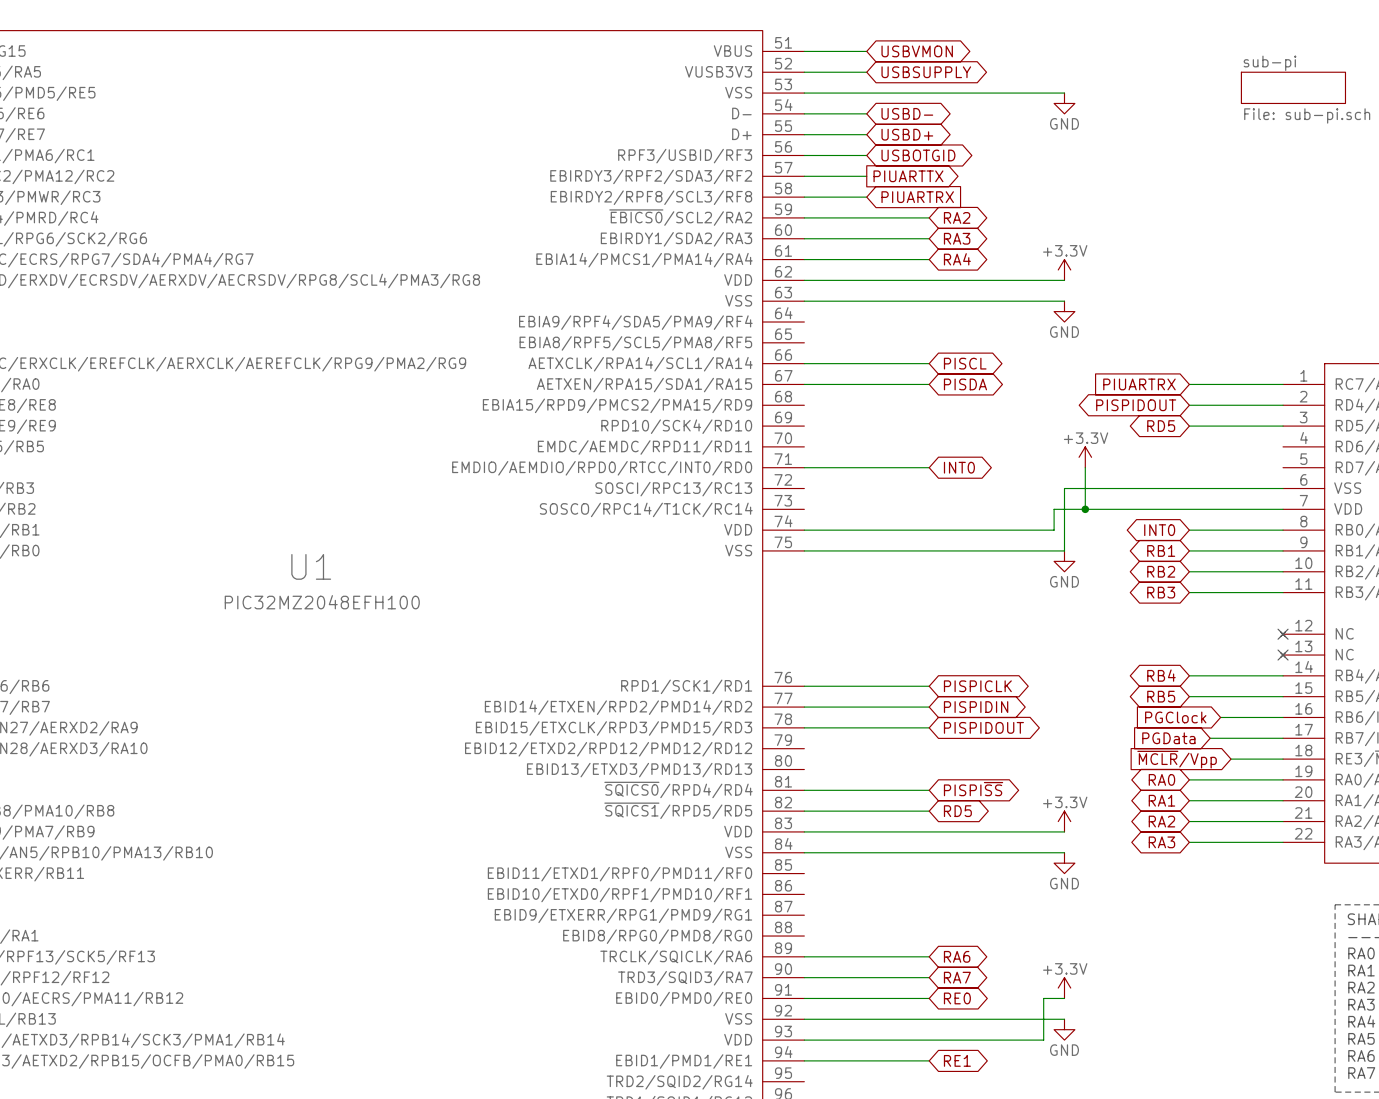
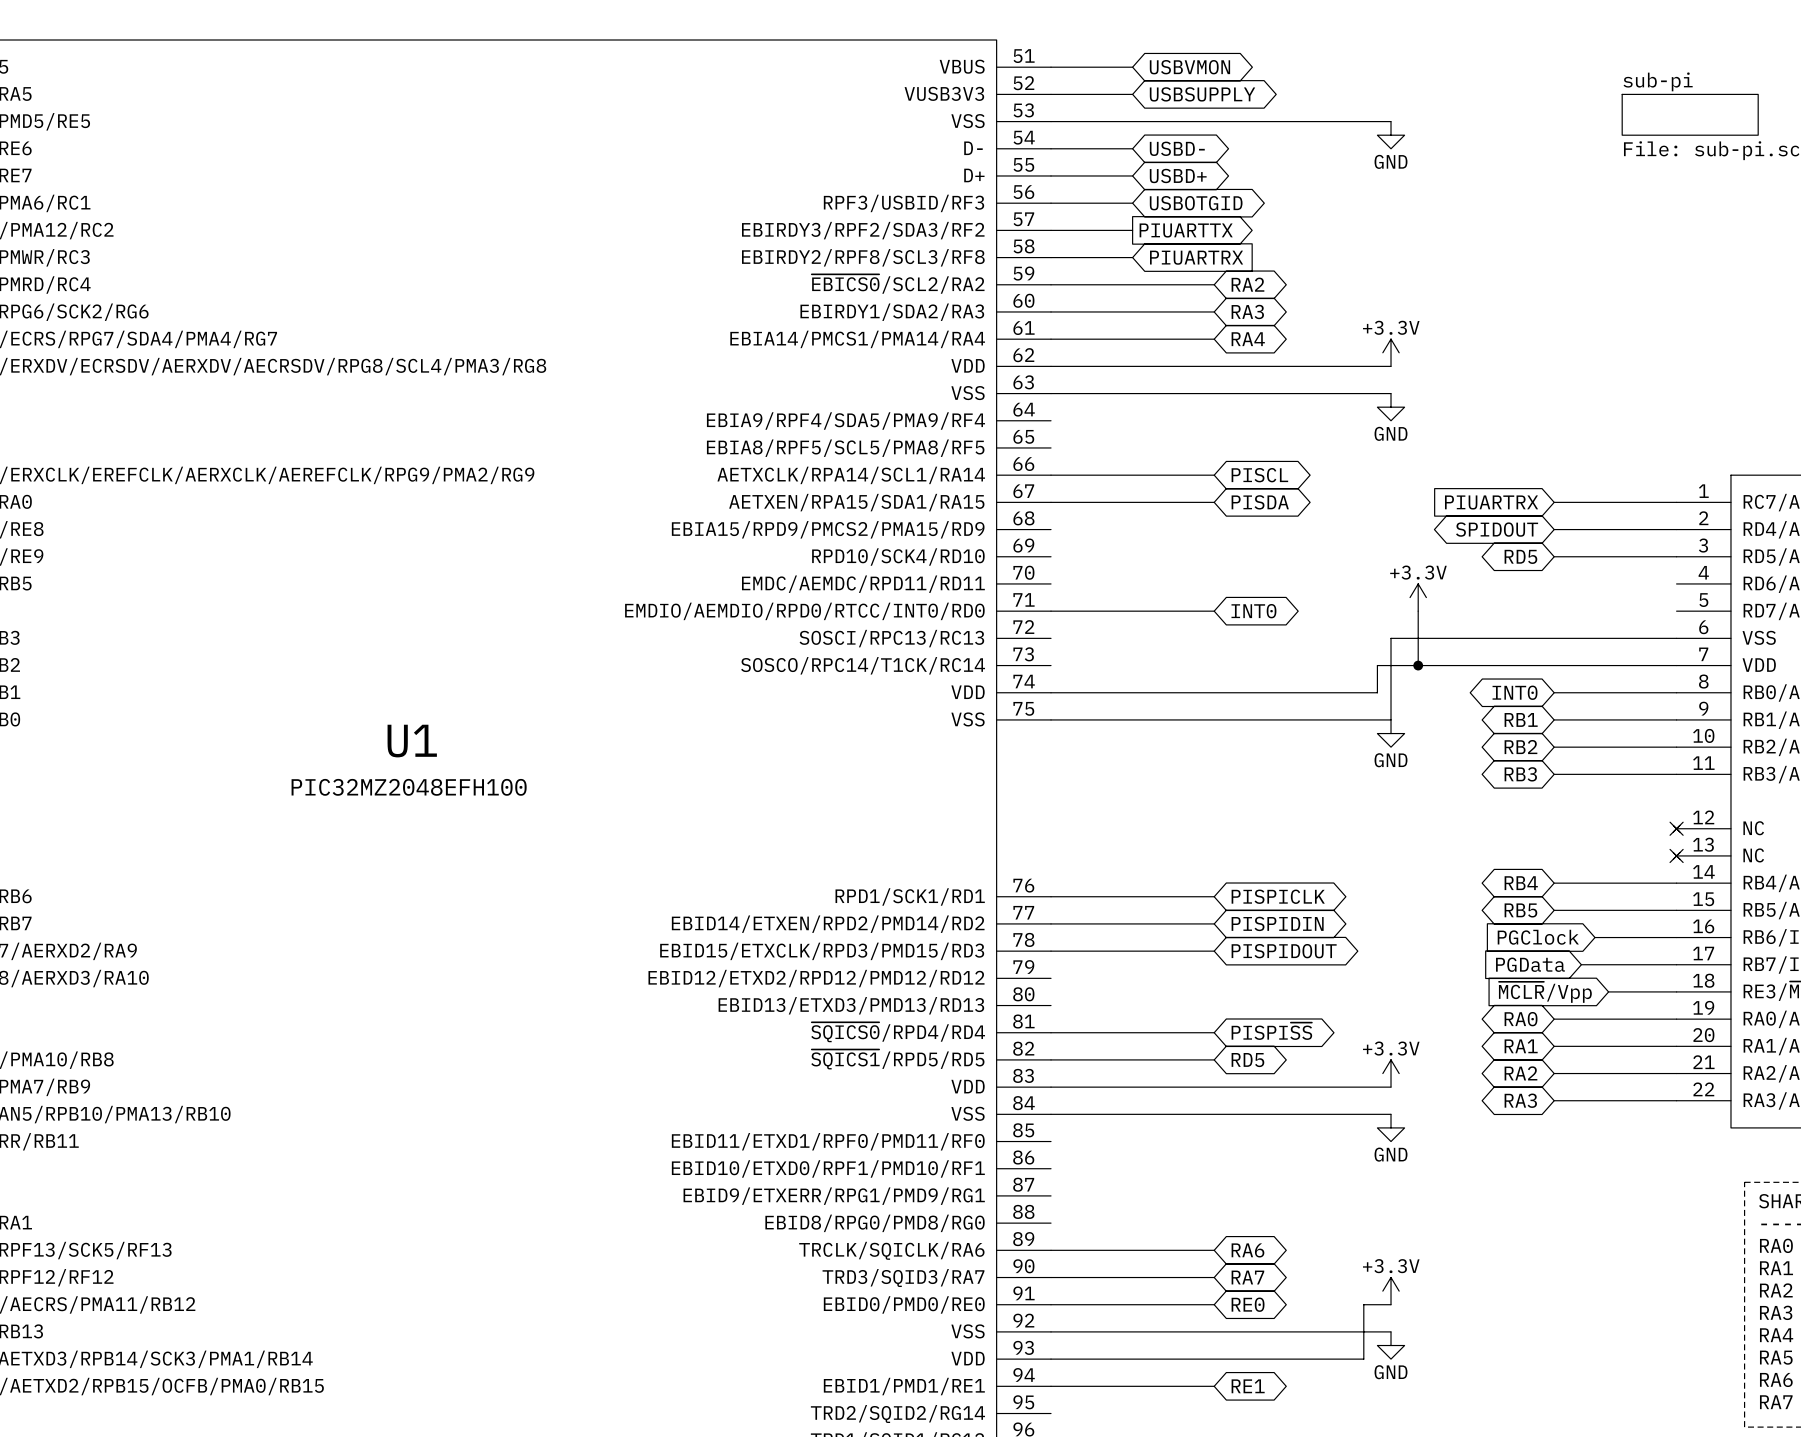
global label: PISPIDOUT (1136, 405) -> SPIDOUT (1497, 529)

